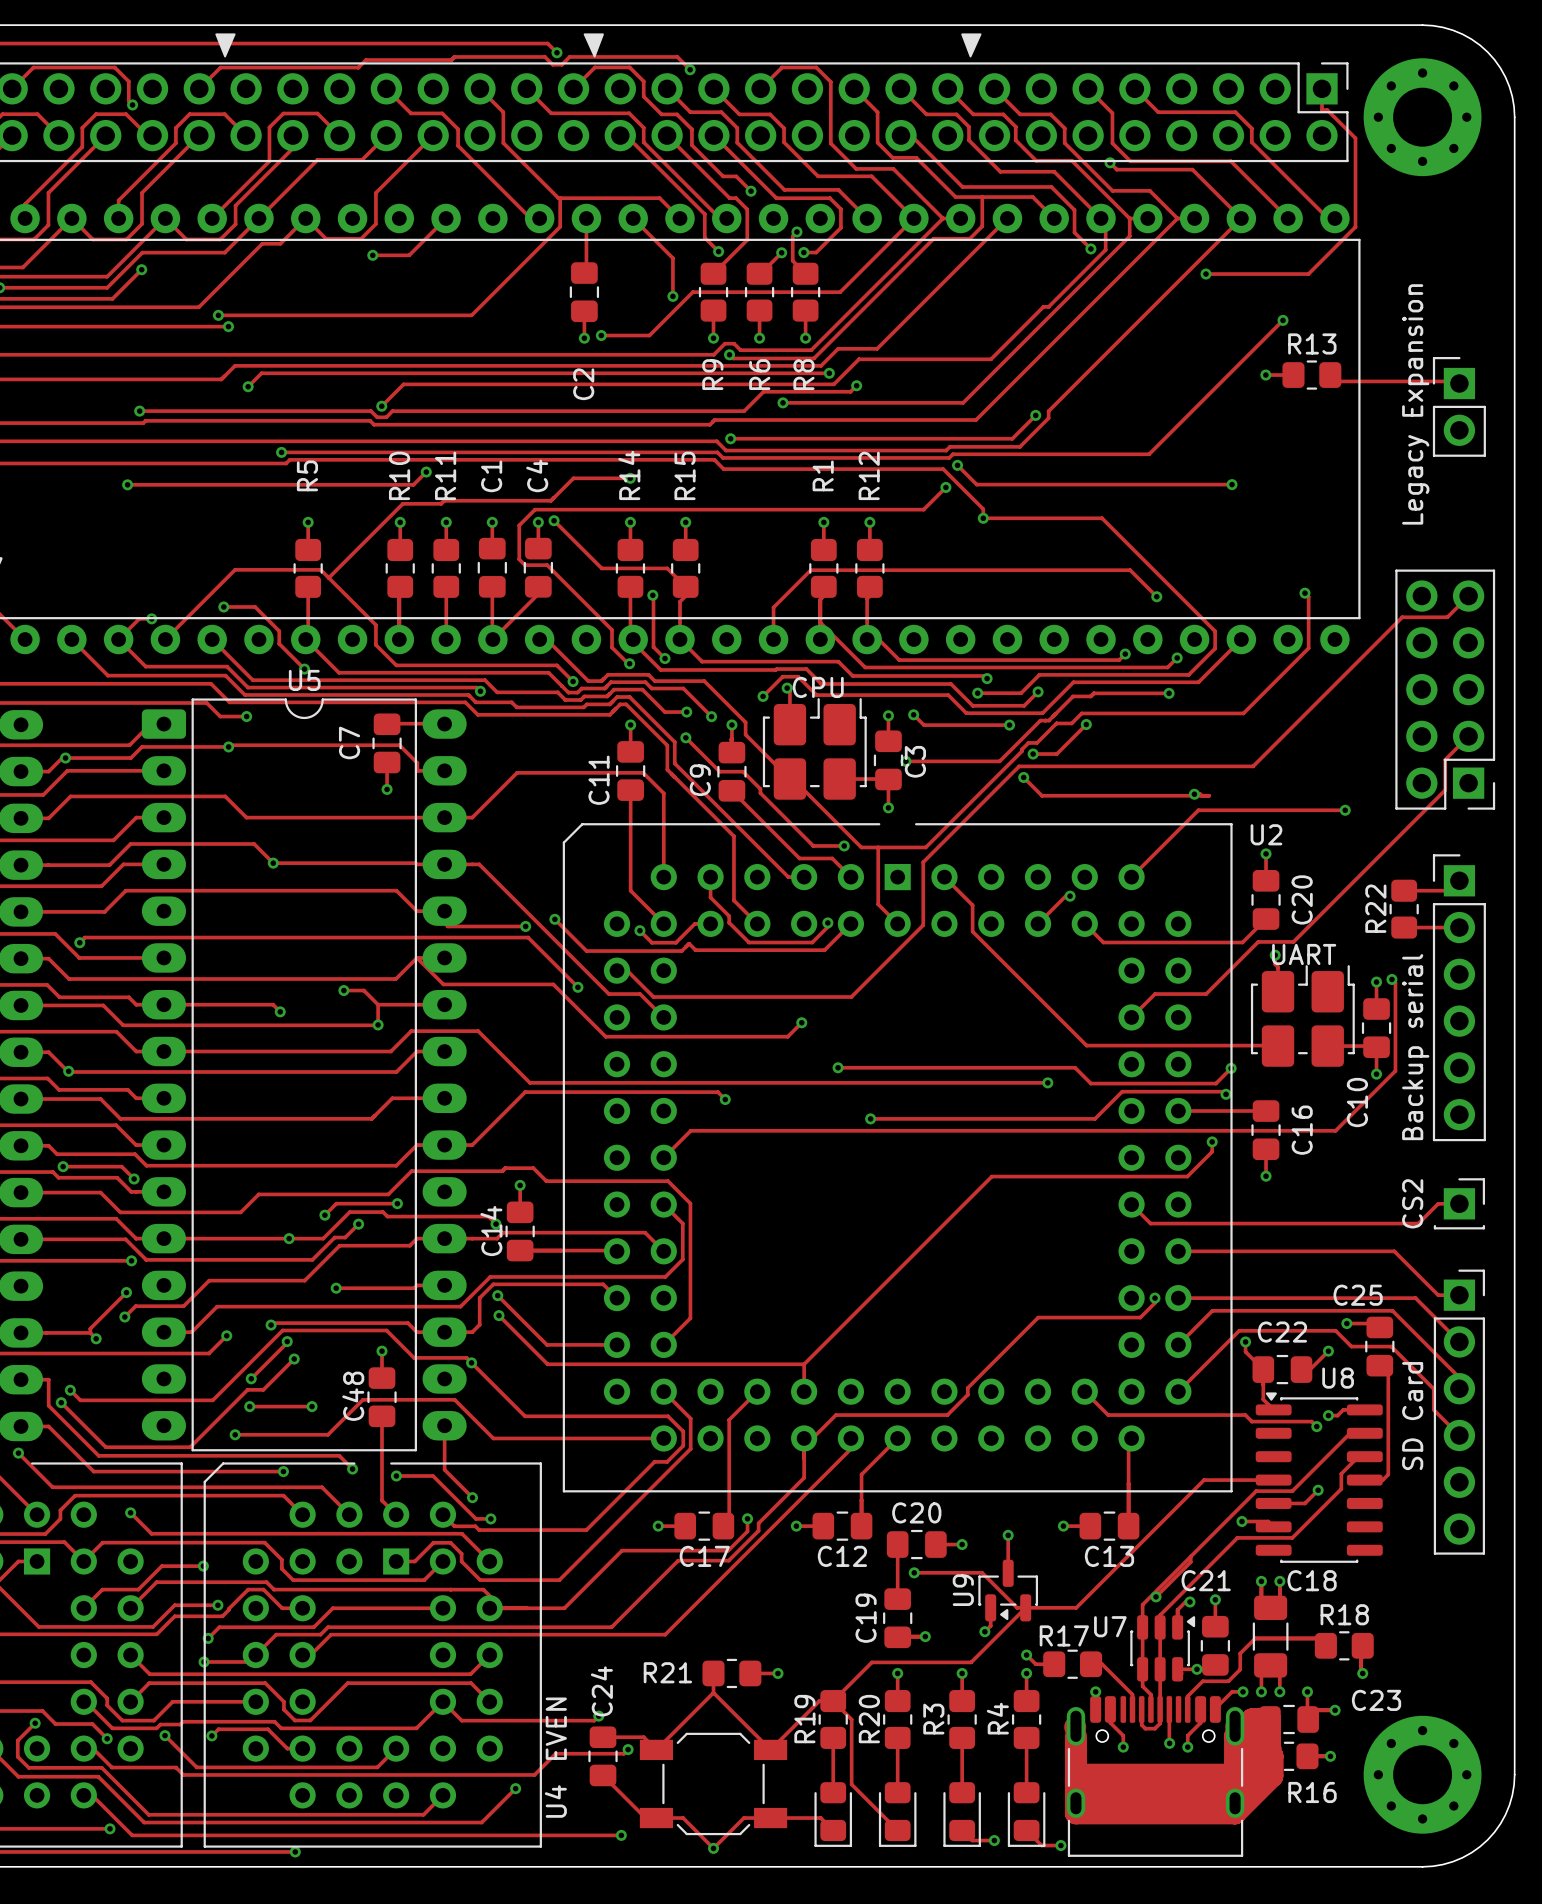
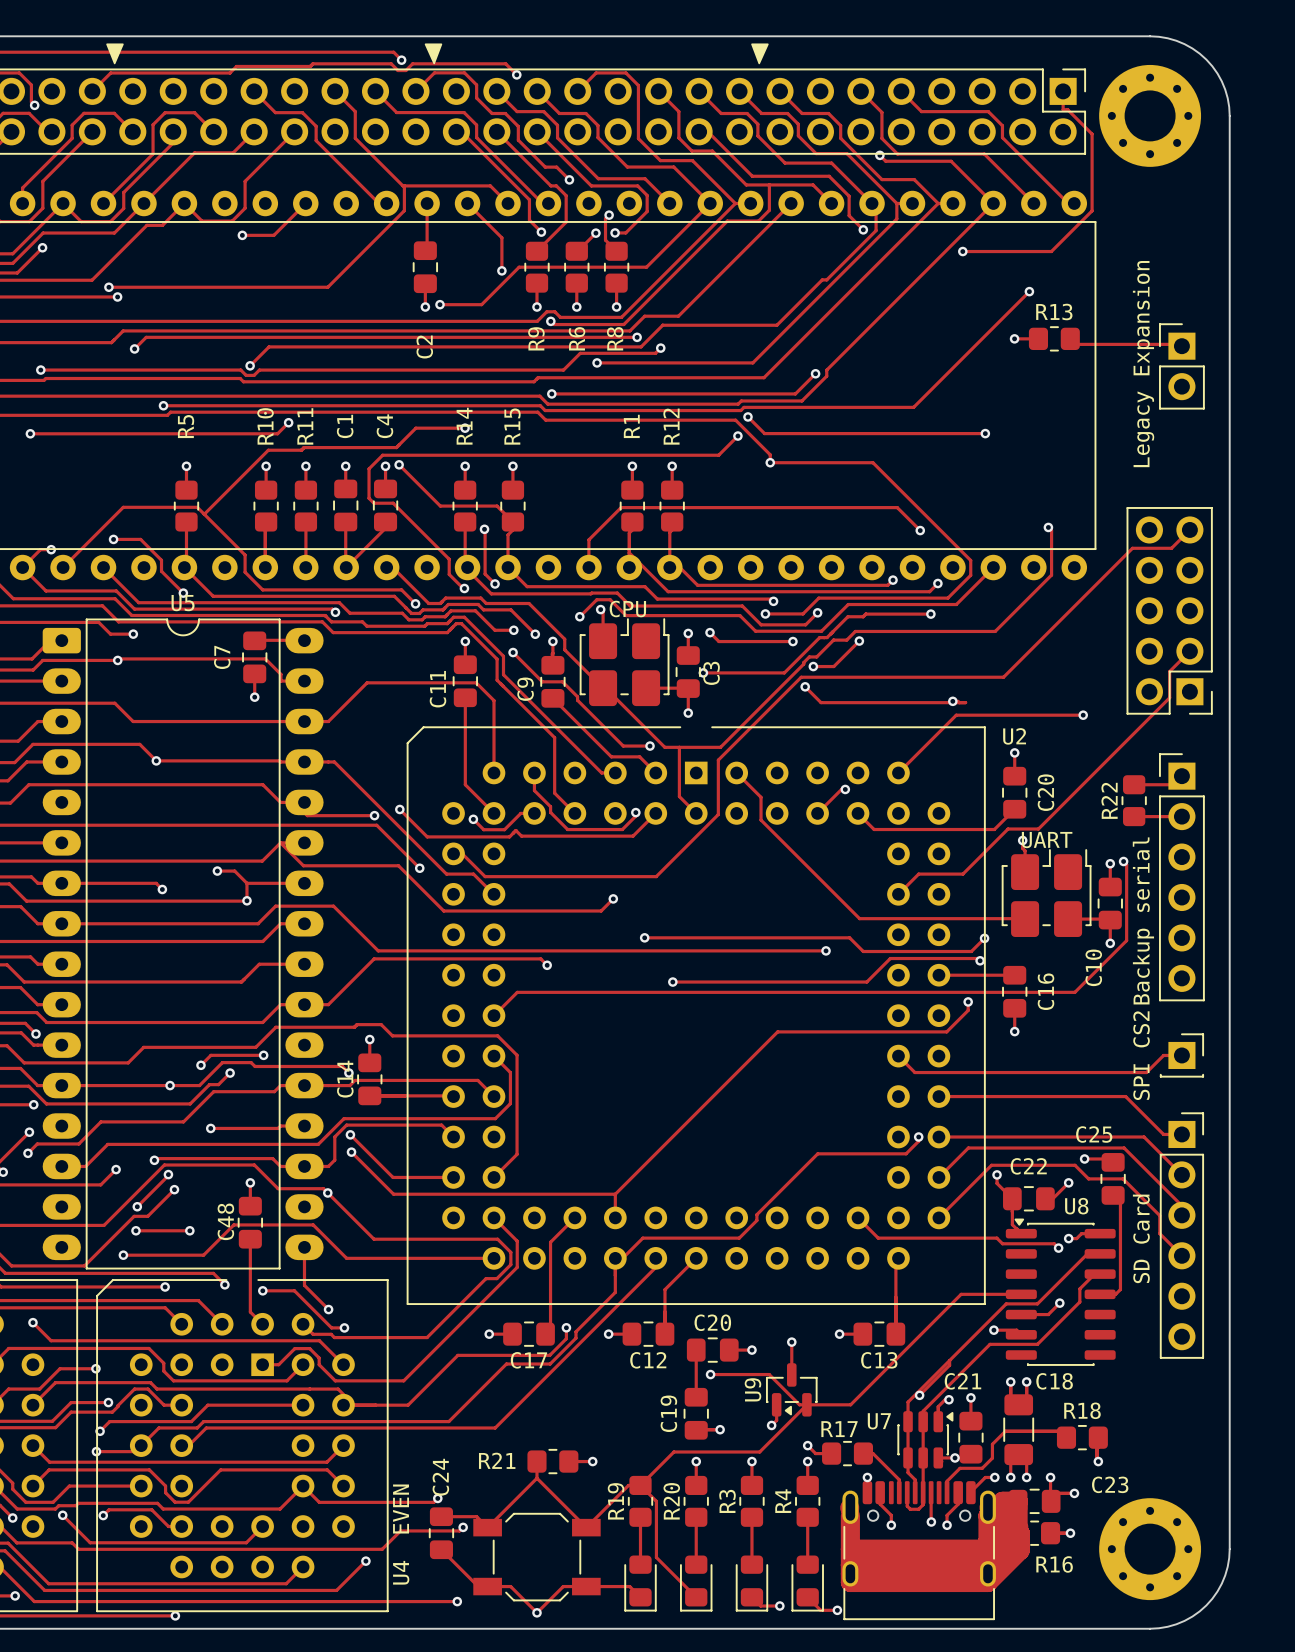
part value: CS2 (1412, 1203) -> SPI CS2 (1141, 1055)

